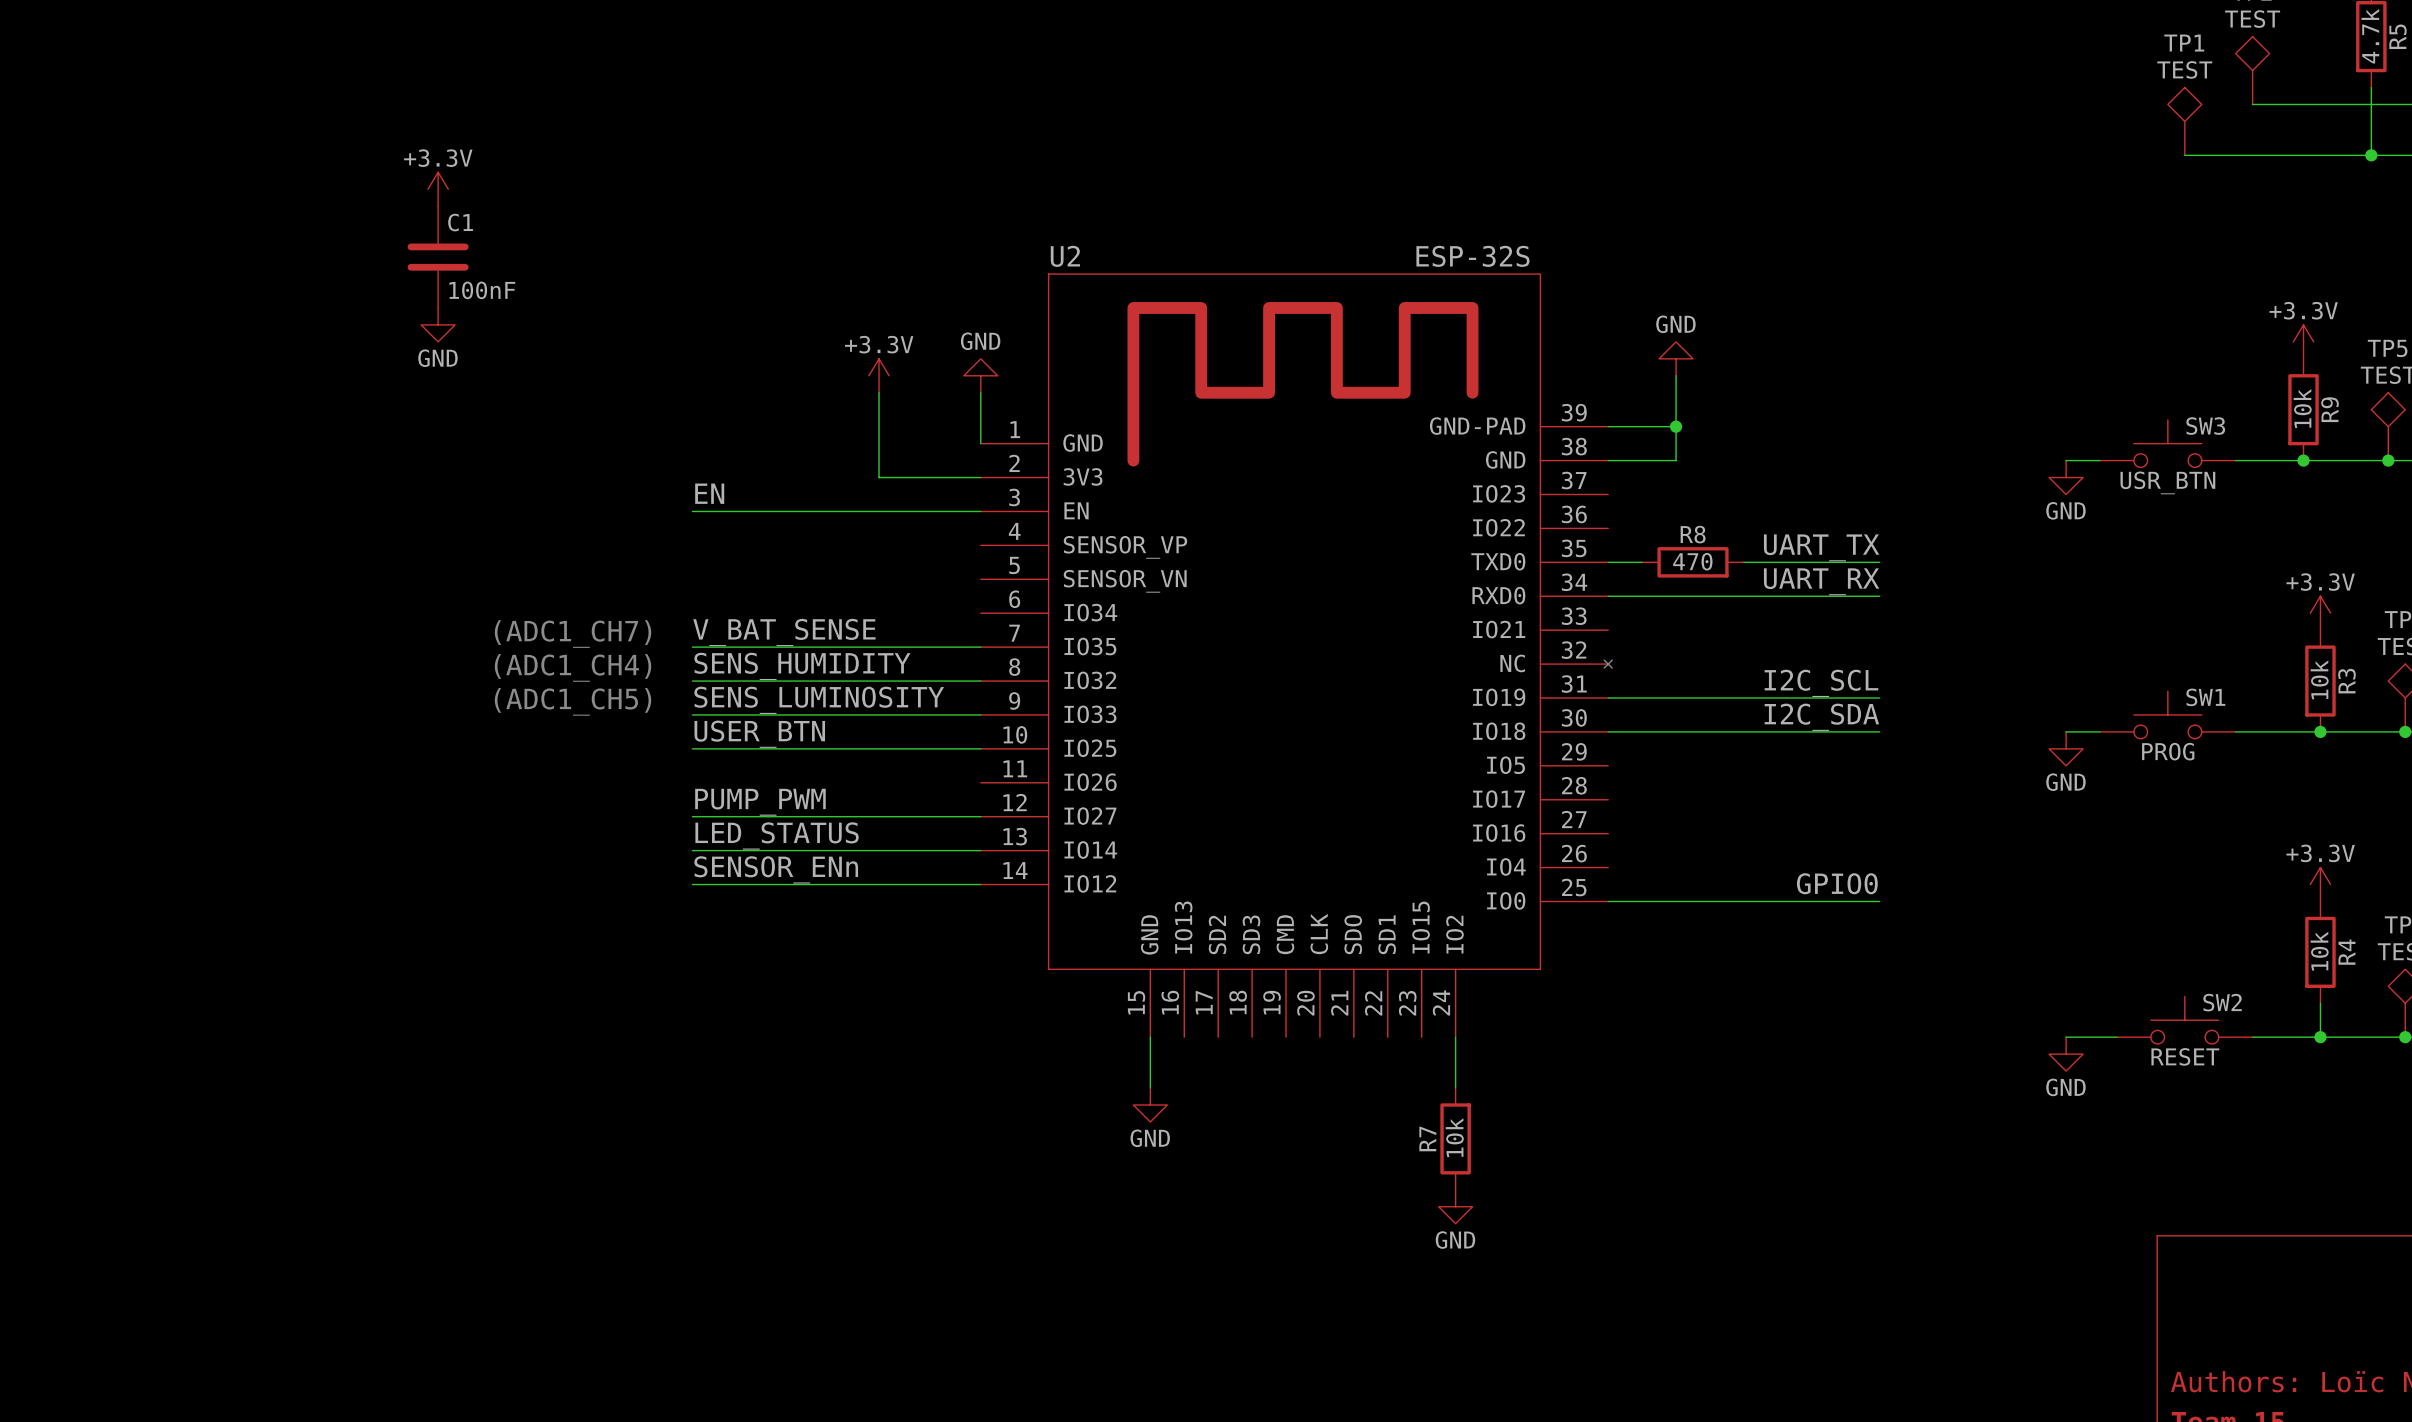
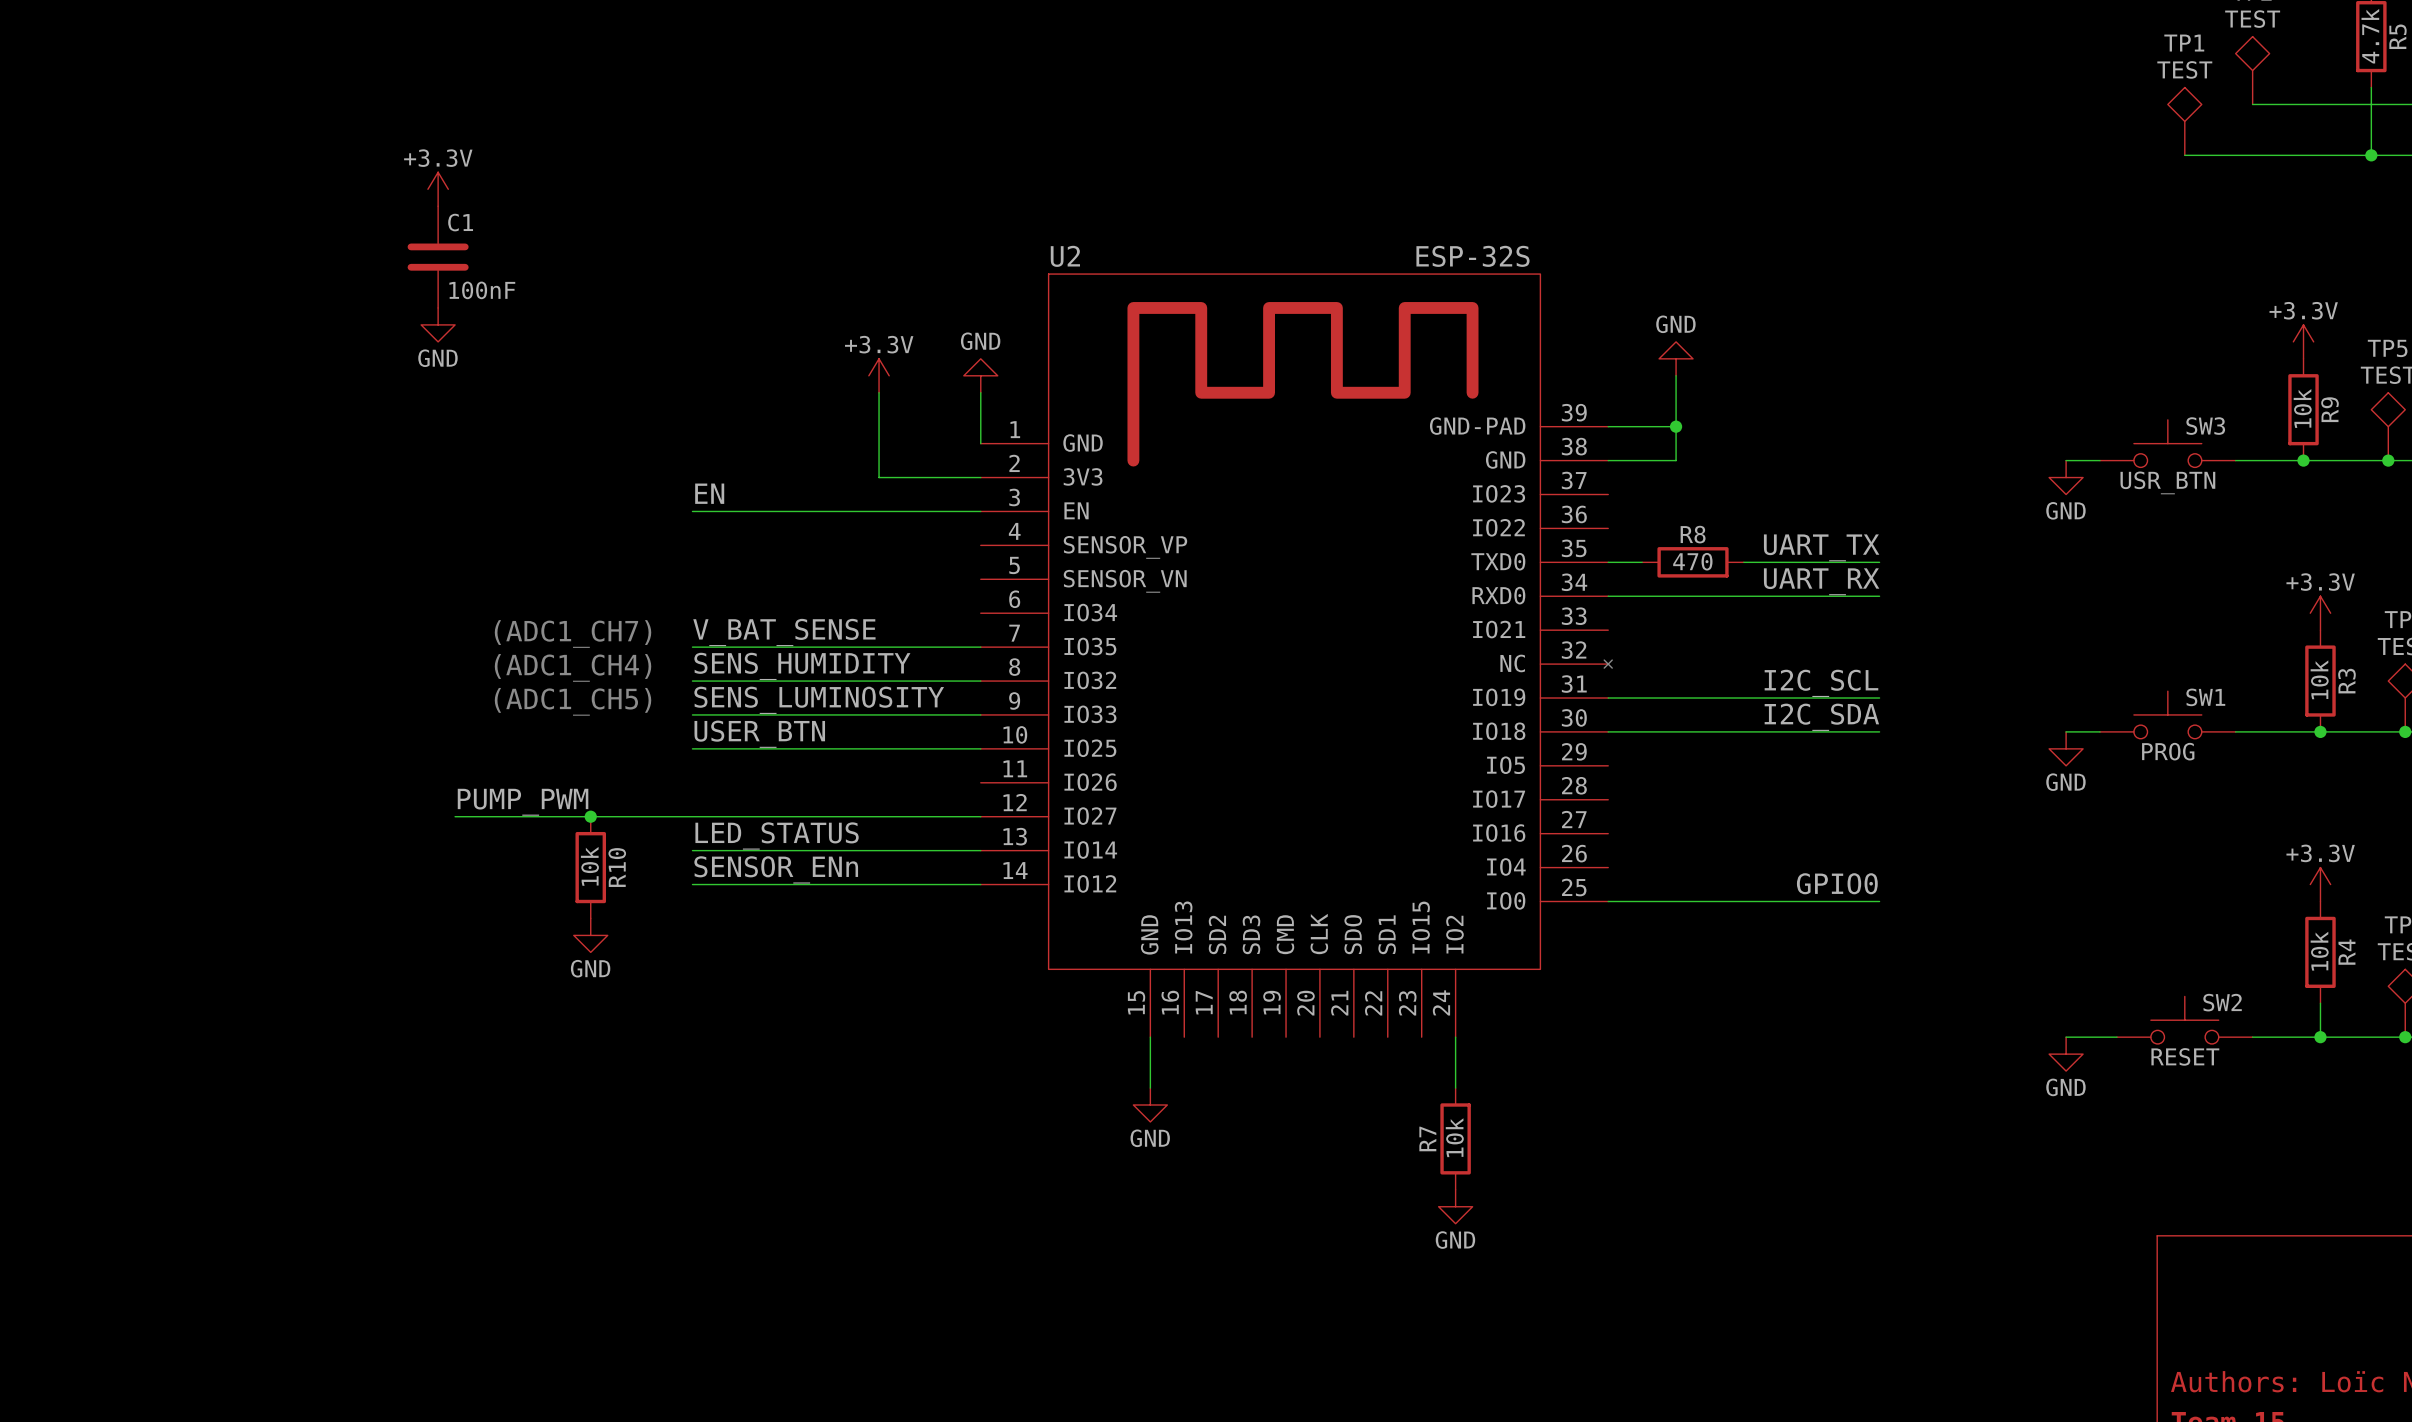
label position: PUMP_PWM (760, 802) -> PUMP_PWM (523, 802)
wire: none -> (455, 816) (692, 816)
junction: none -> (590, 816)
R10: none -> 10k (590, 867)
power symbol: none -> GND (590, 935)

